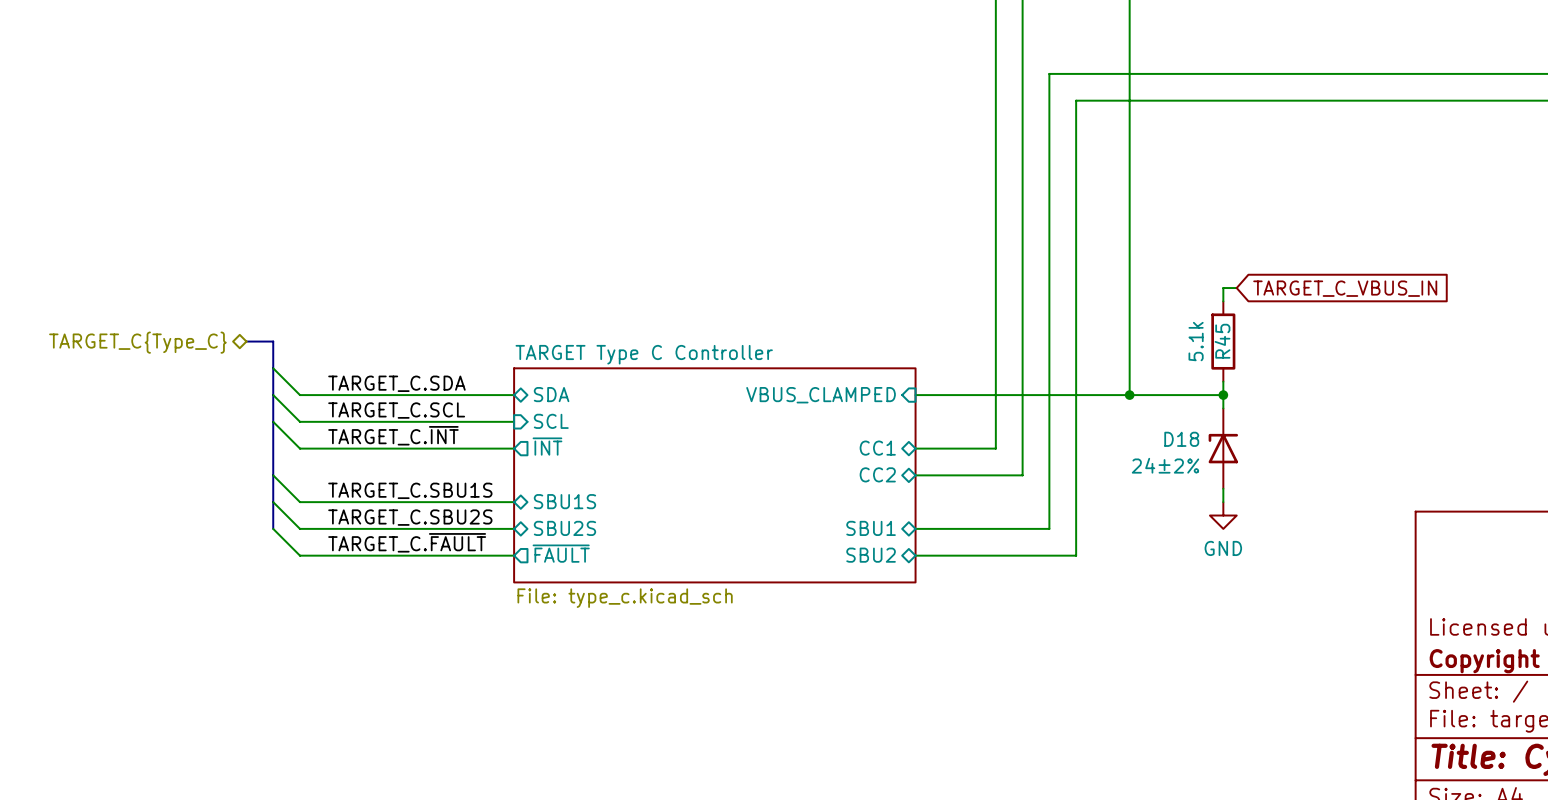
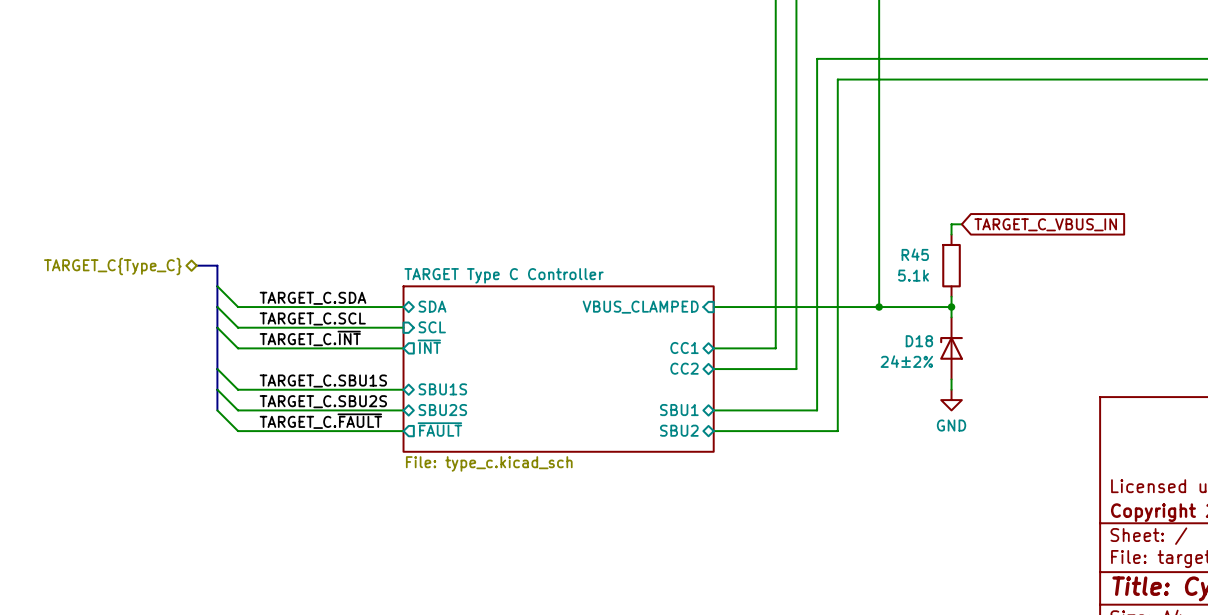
R45 value rotation: 0° (1196, 341) -> 90° clockwise (913, 275)
R45 name rotation: 0° (1222, 341) -> 90° clockwise (915, 254)
R45 name position: R45 (1222, 341) -> R45 (915, 254)

